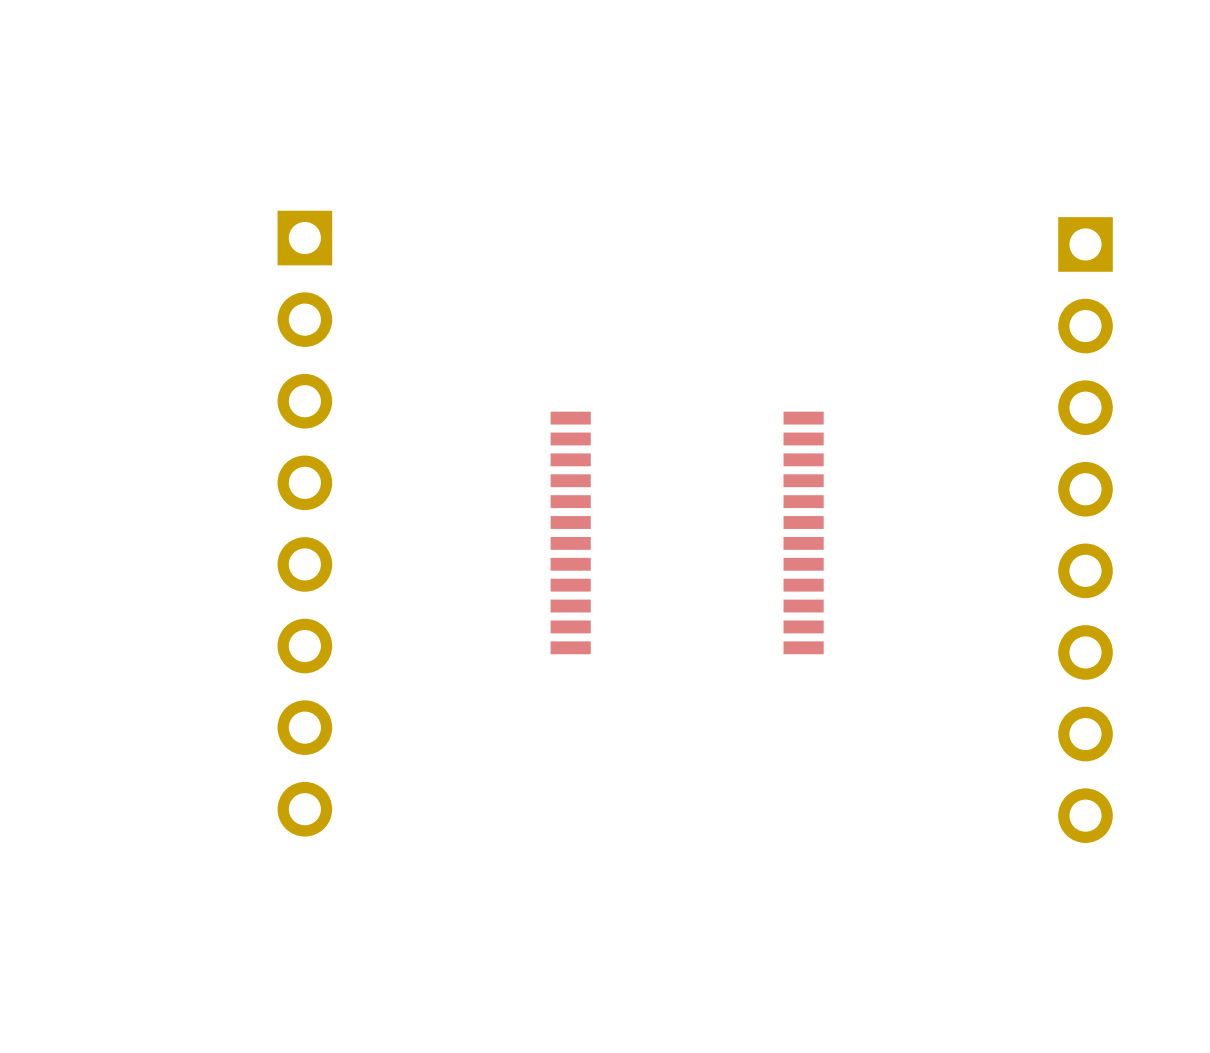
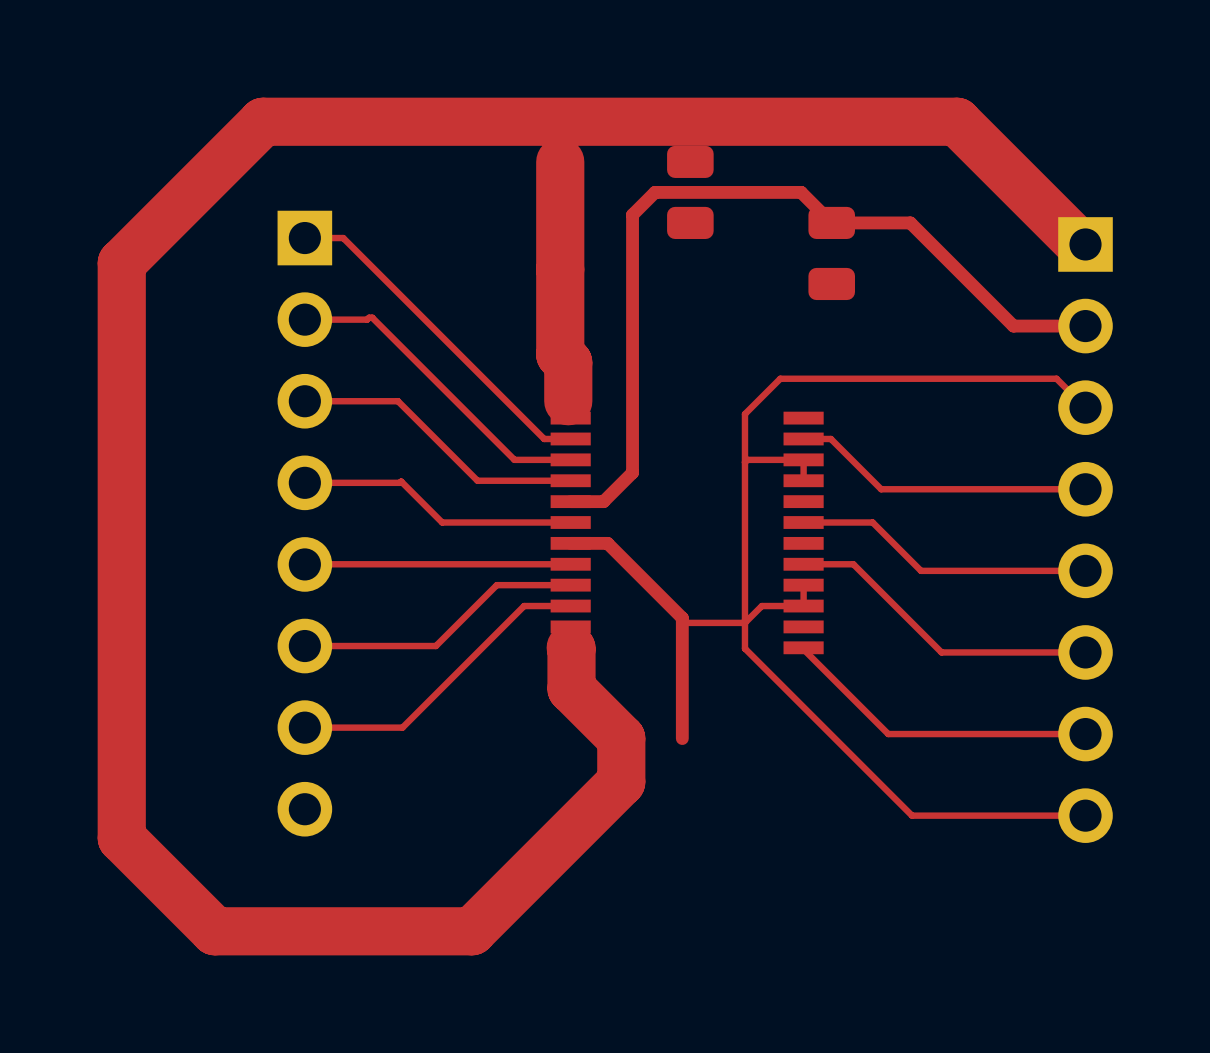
top track: none -> (560, 161) (560, 354) (568, 362) (568, 401)
part: none -> (690, 192)
top track: none -> (304, 238) (343, 238) (544, 438) (570, 438)
top track: none -> (1085, 244) (1079, 244) (957, 121) (263, 121) (121, 263) (121, 838) (214, 931) (471, 931) (621, 781) (621, 738) (571, 688) (570, 647)
part: none -> (831, 253)
top track: none -> (304, 319) (367, 319) (372, 317) (514, 459) (570, 459)
top track: none -> (1085, 326) (1013, 326) (910, 222) (831, 222) (801, 192) (655, 192) (632, 214) (632, 472) (603, 501) (570, 501)
top track: none -> (304, 401) (398, 401) (477, 480) (570, 480)
top track: none -> (1085, 407) (1056, 378) (780, 378) (744, 414) (744, 648) (912, 815) (1085, 815)
top track: none -> (803, 438) (830, 438) (881, 489) (1085, 489)
top track: none -> (744, 462) (747, 459) (803, 459) (803, 480)
top track: none -> (304, 482) (401, 481) (442, 522) (570, 522)
top track: none -> (803, 522) (872, 522) (921, 570) (1085, 570)
top track: none -> (570, 543) (607, 543) (682, 618)
top track: none -> (570, 564) (305, 564)
top track: none -> (803, 564) (853, 564) (941, 652) (1085, 652)
top track: none -> (570, 585) (496, 585) (435, 646) (304, 646)
top track: none -> (803, 585) (803, 606) (761, 606) (744, 622) (687, 622) (682, 618)
top track: none -> (570, 606) (524, 606) (402, 727) (304, 727)
top track: none -> (682, 618) (682, 738)
top track: none -> (803, 647) (888, 734) (1085, 734)

